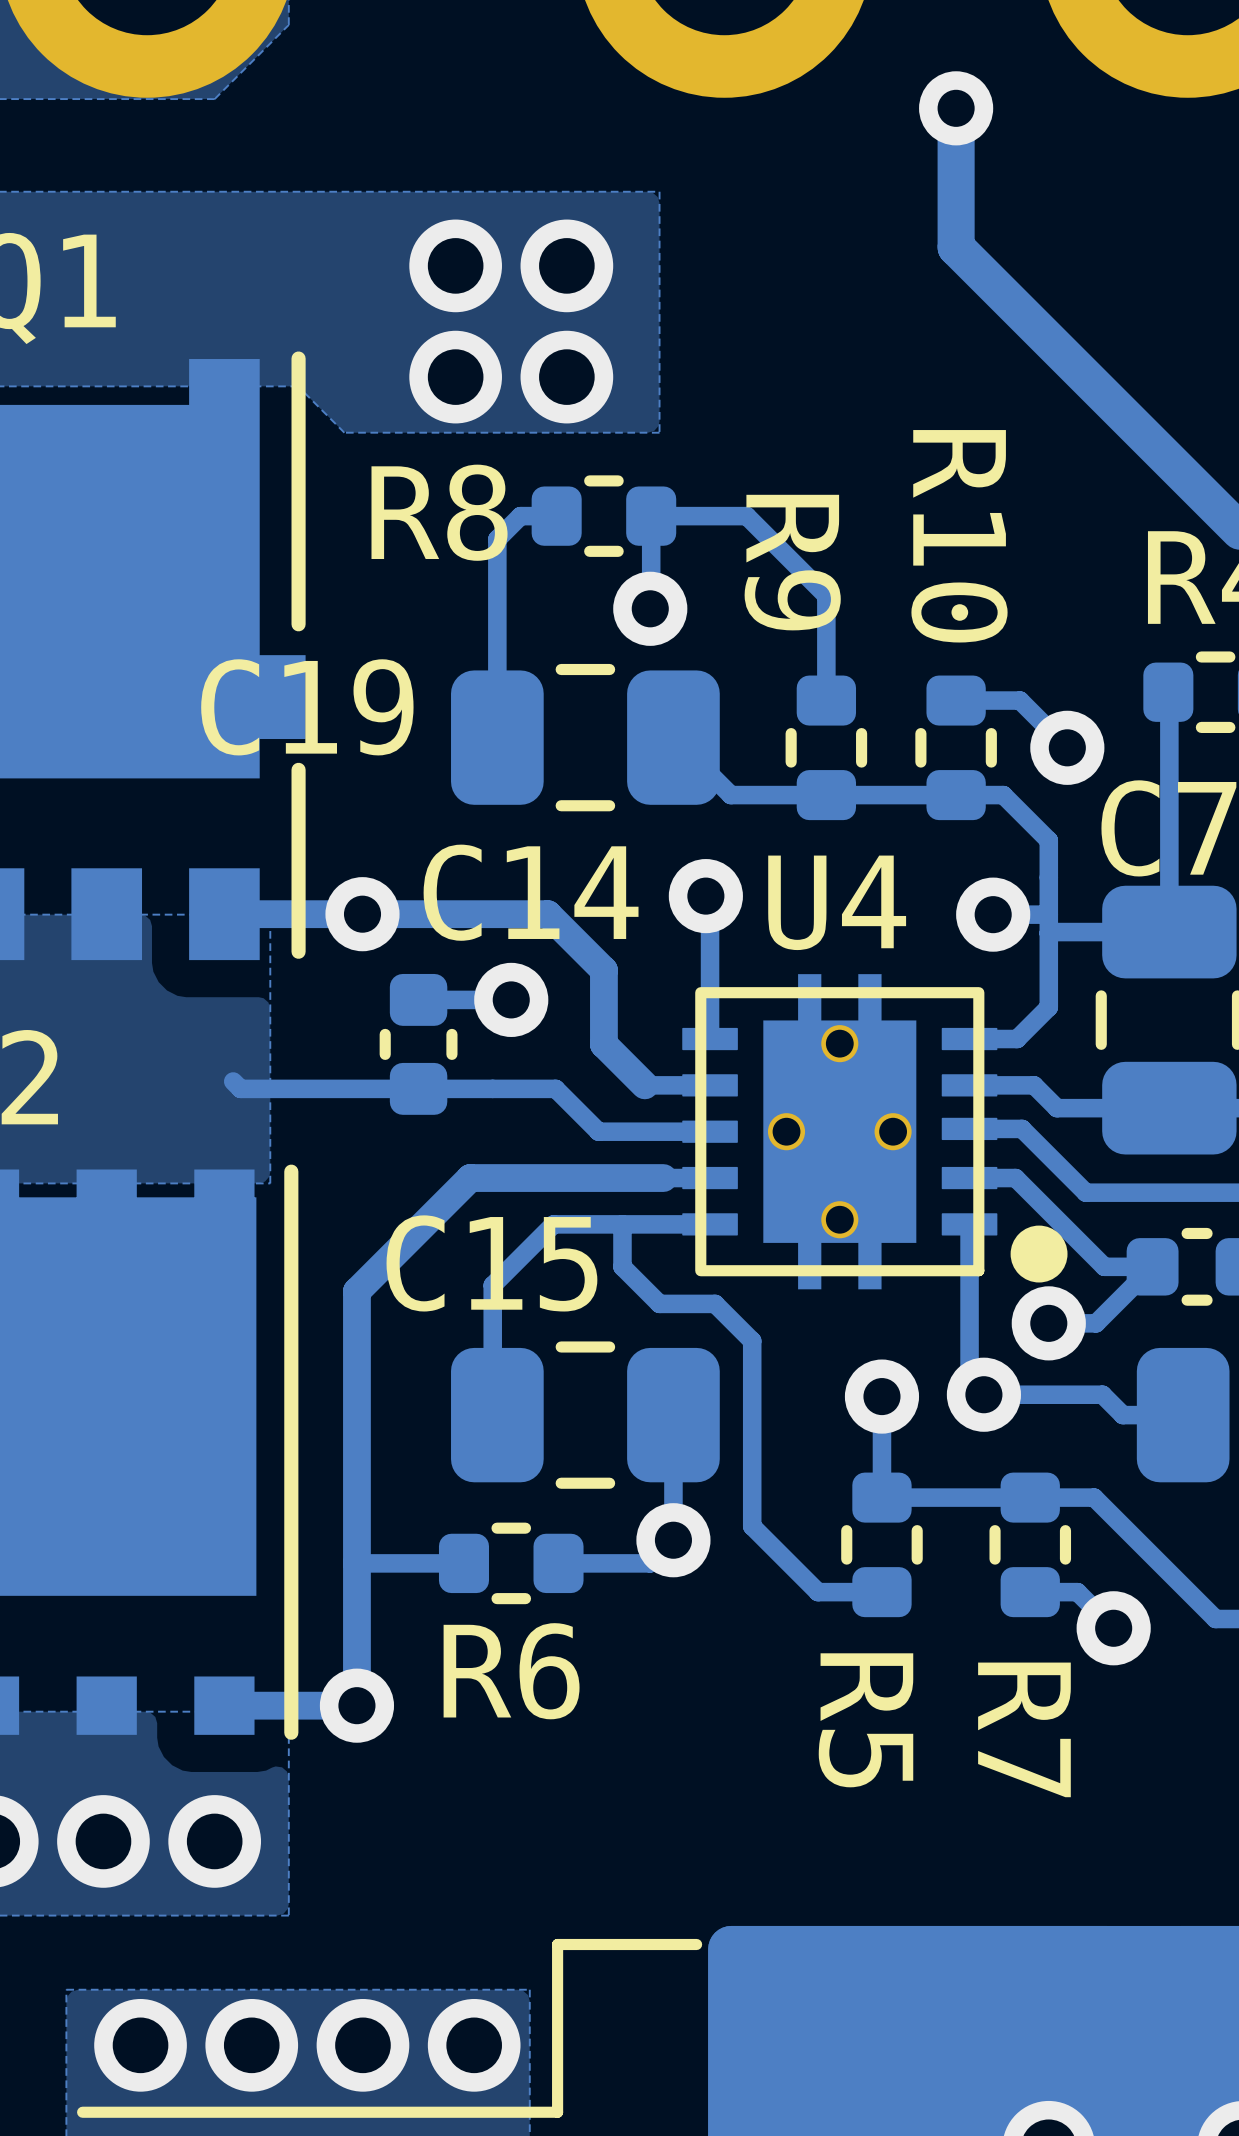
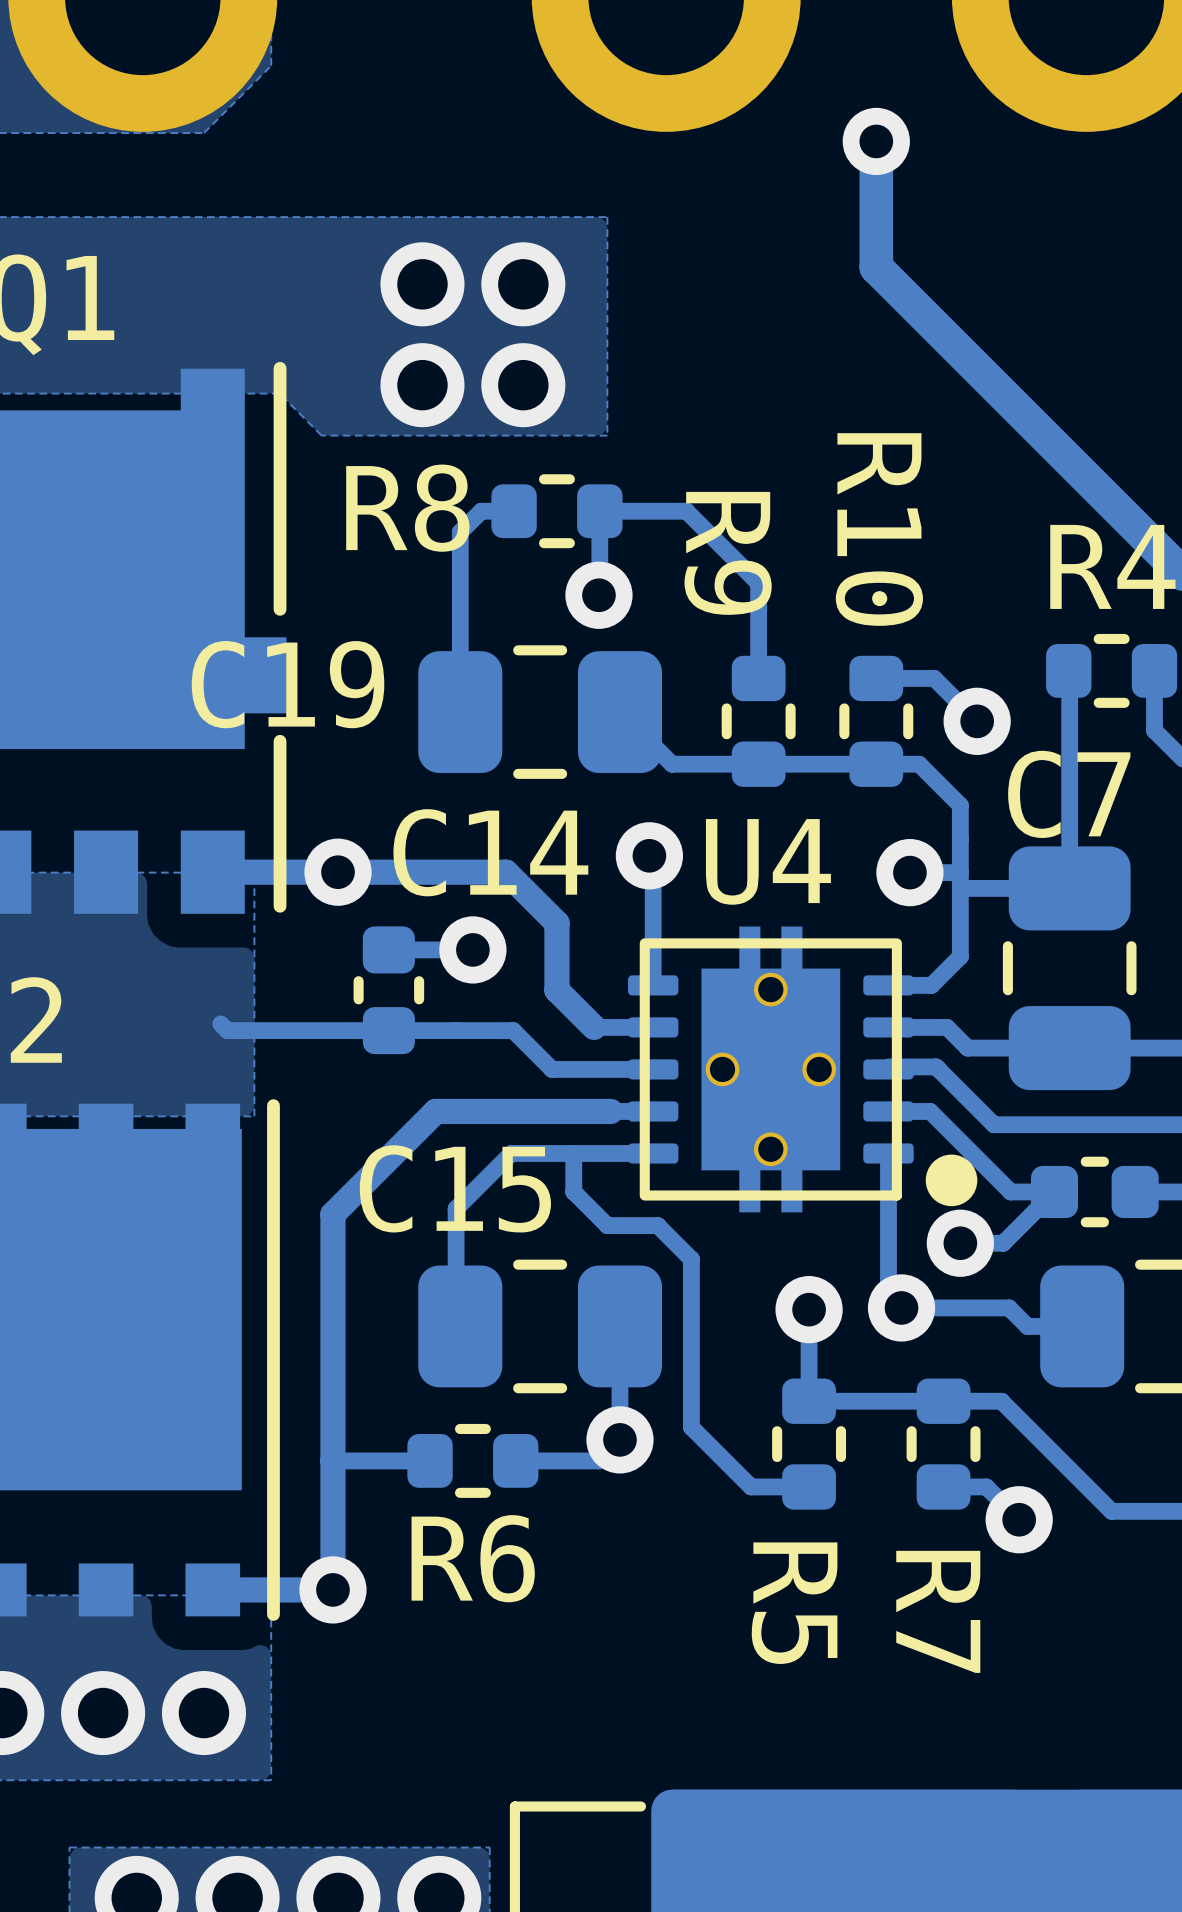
U4 footprint: [682, 974, 1068, 1290] -> [627, 926, 978, 1213]

